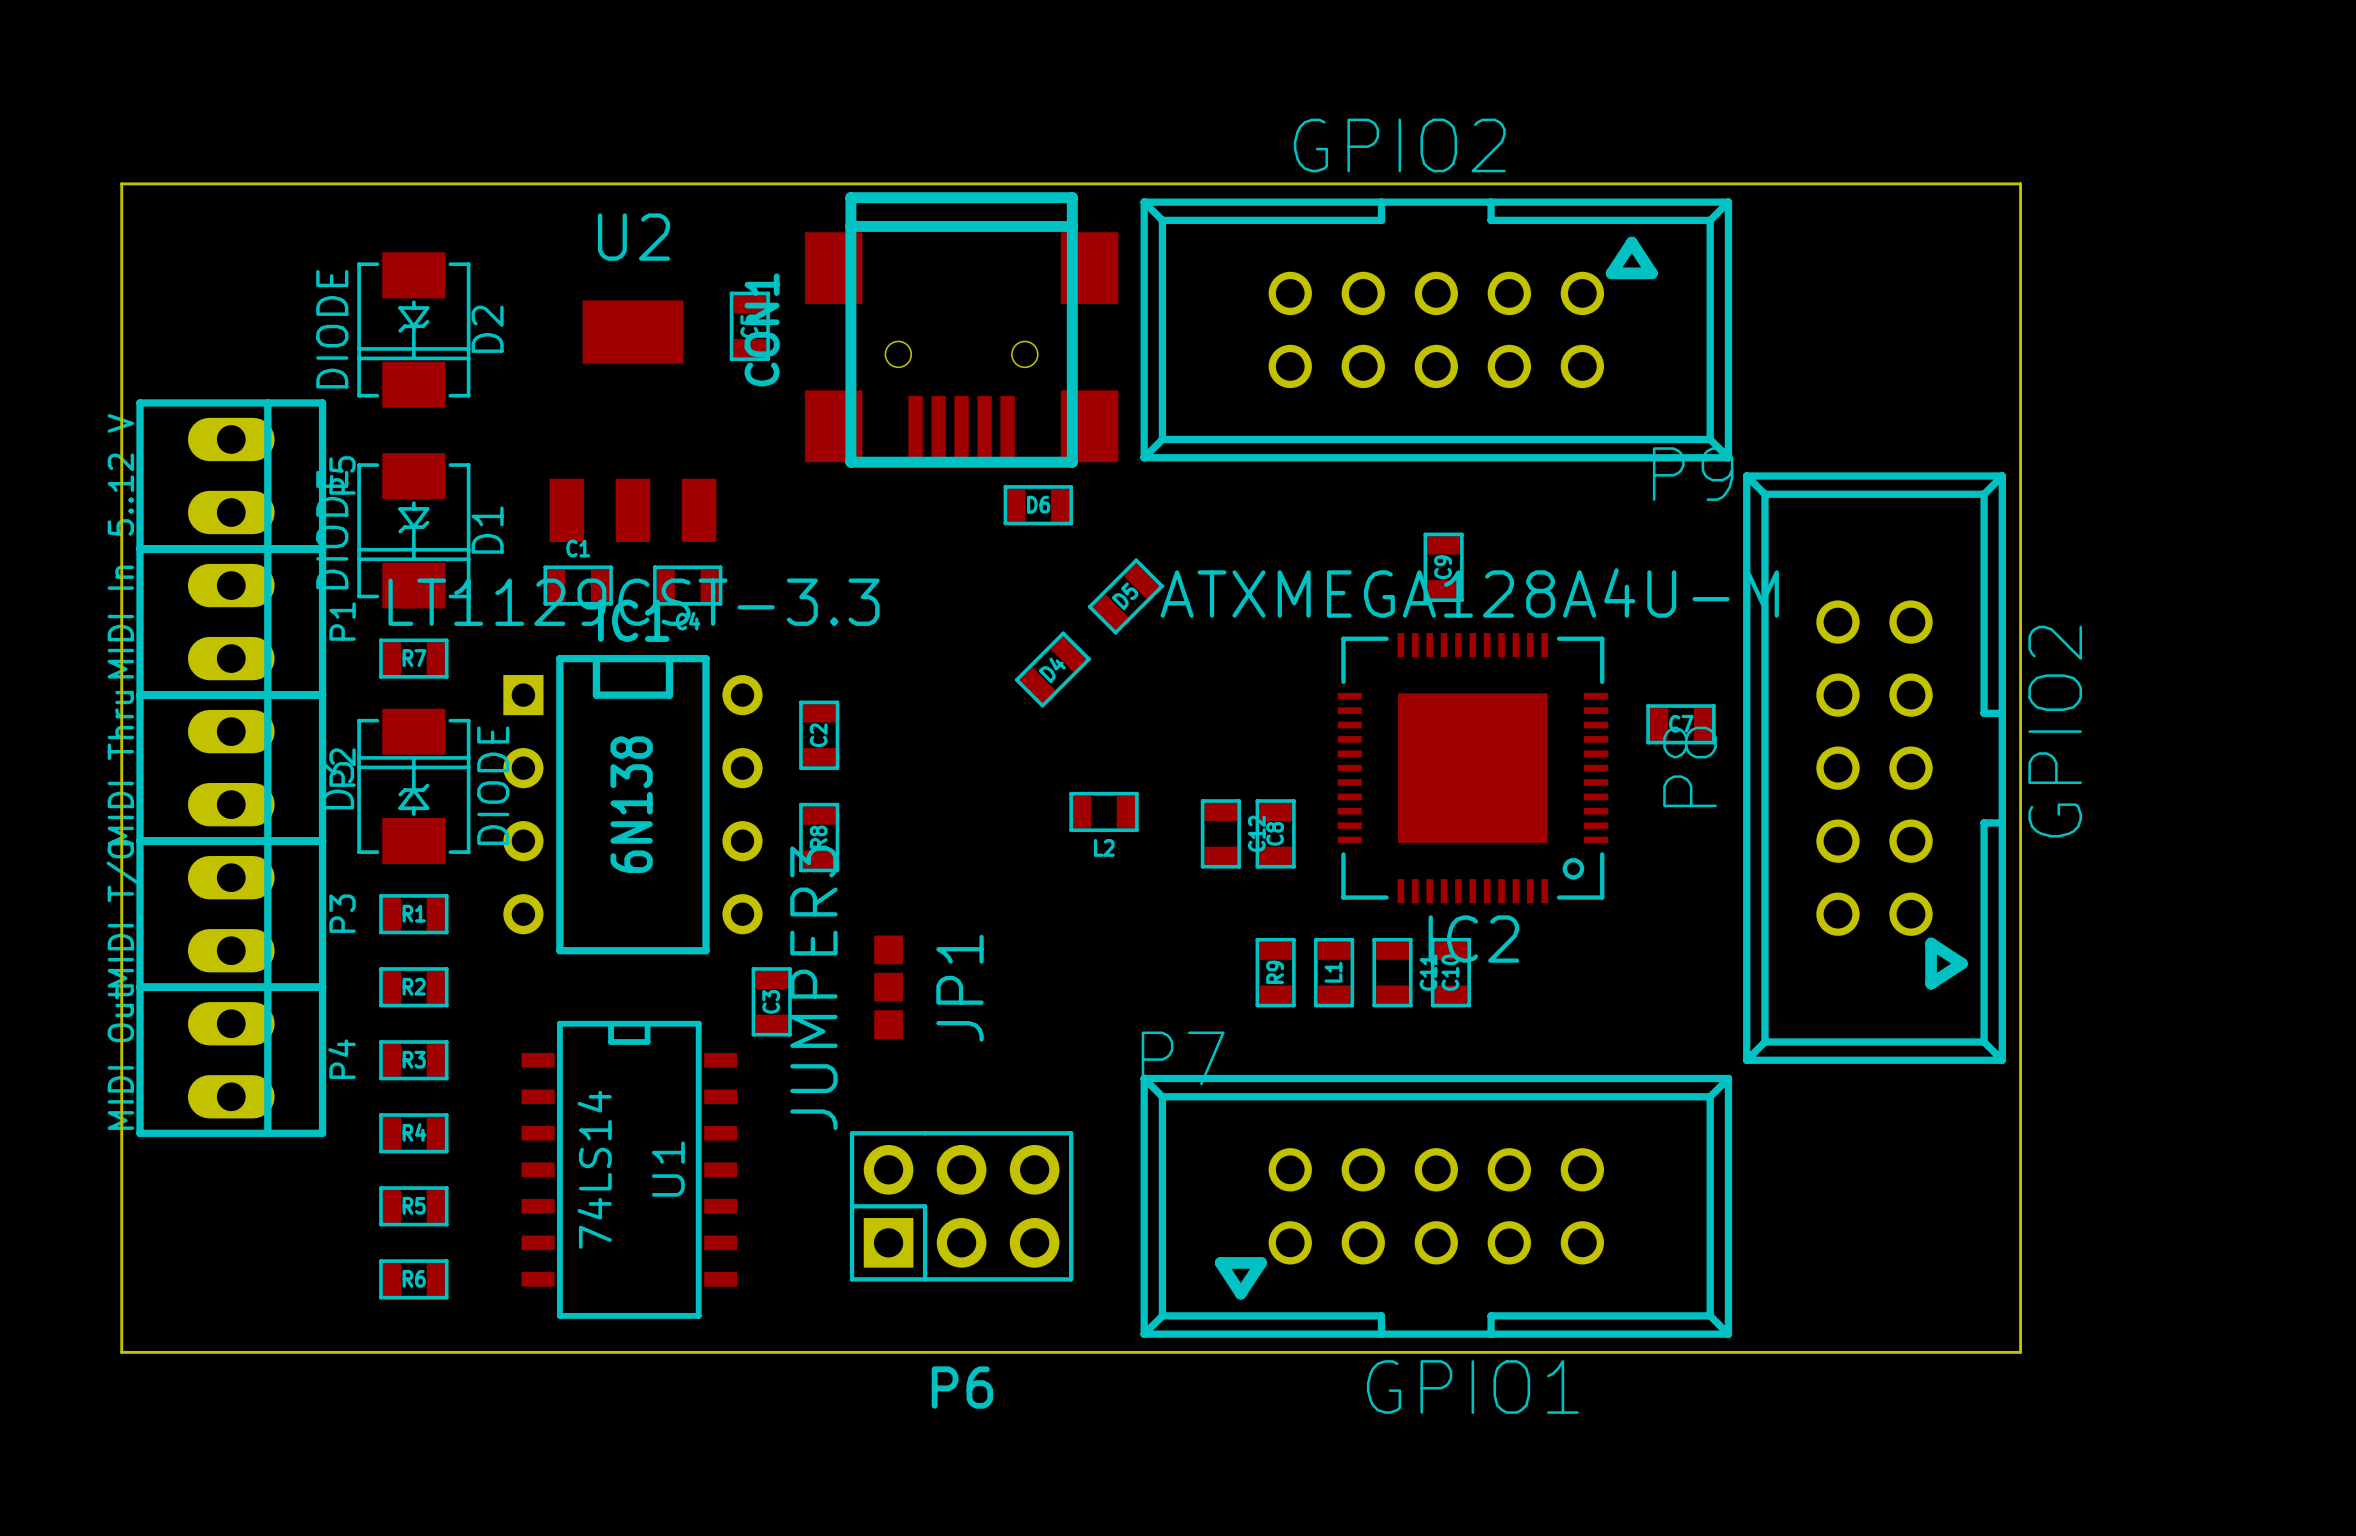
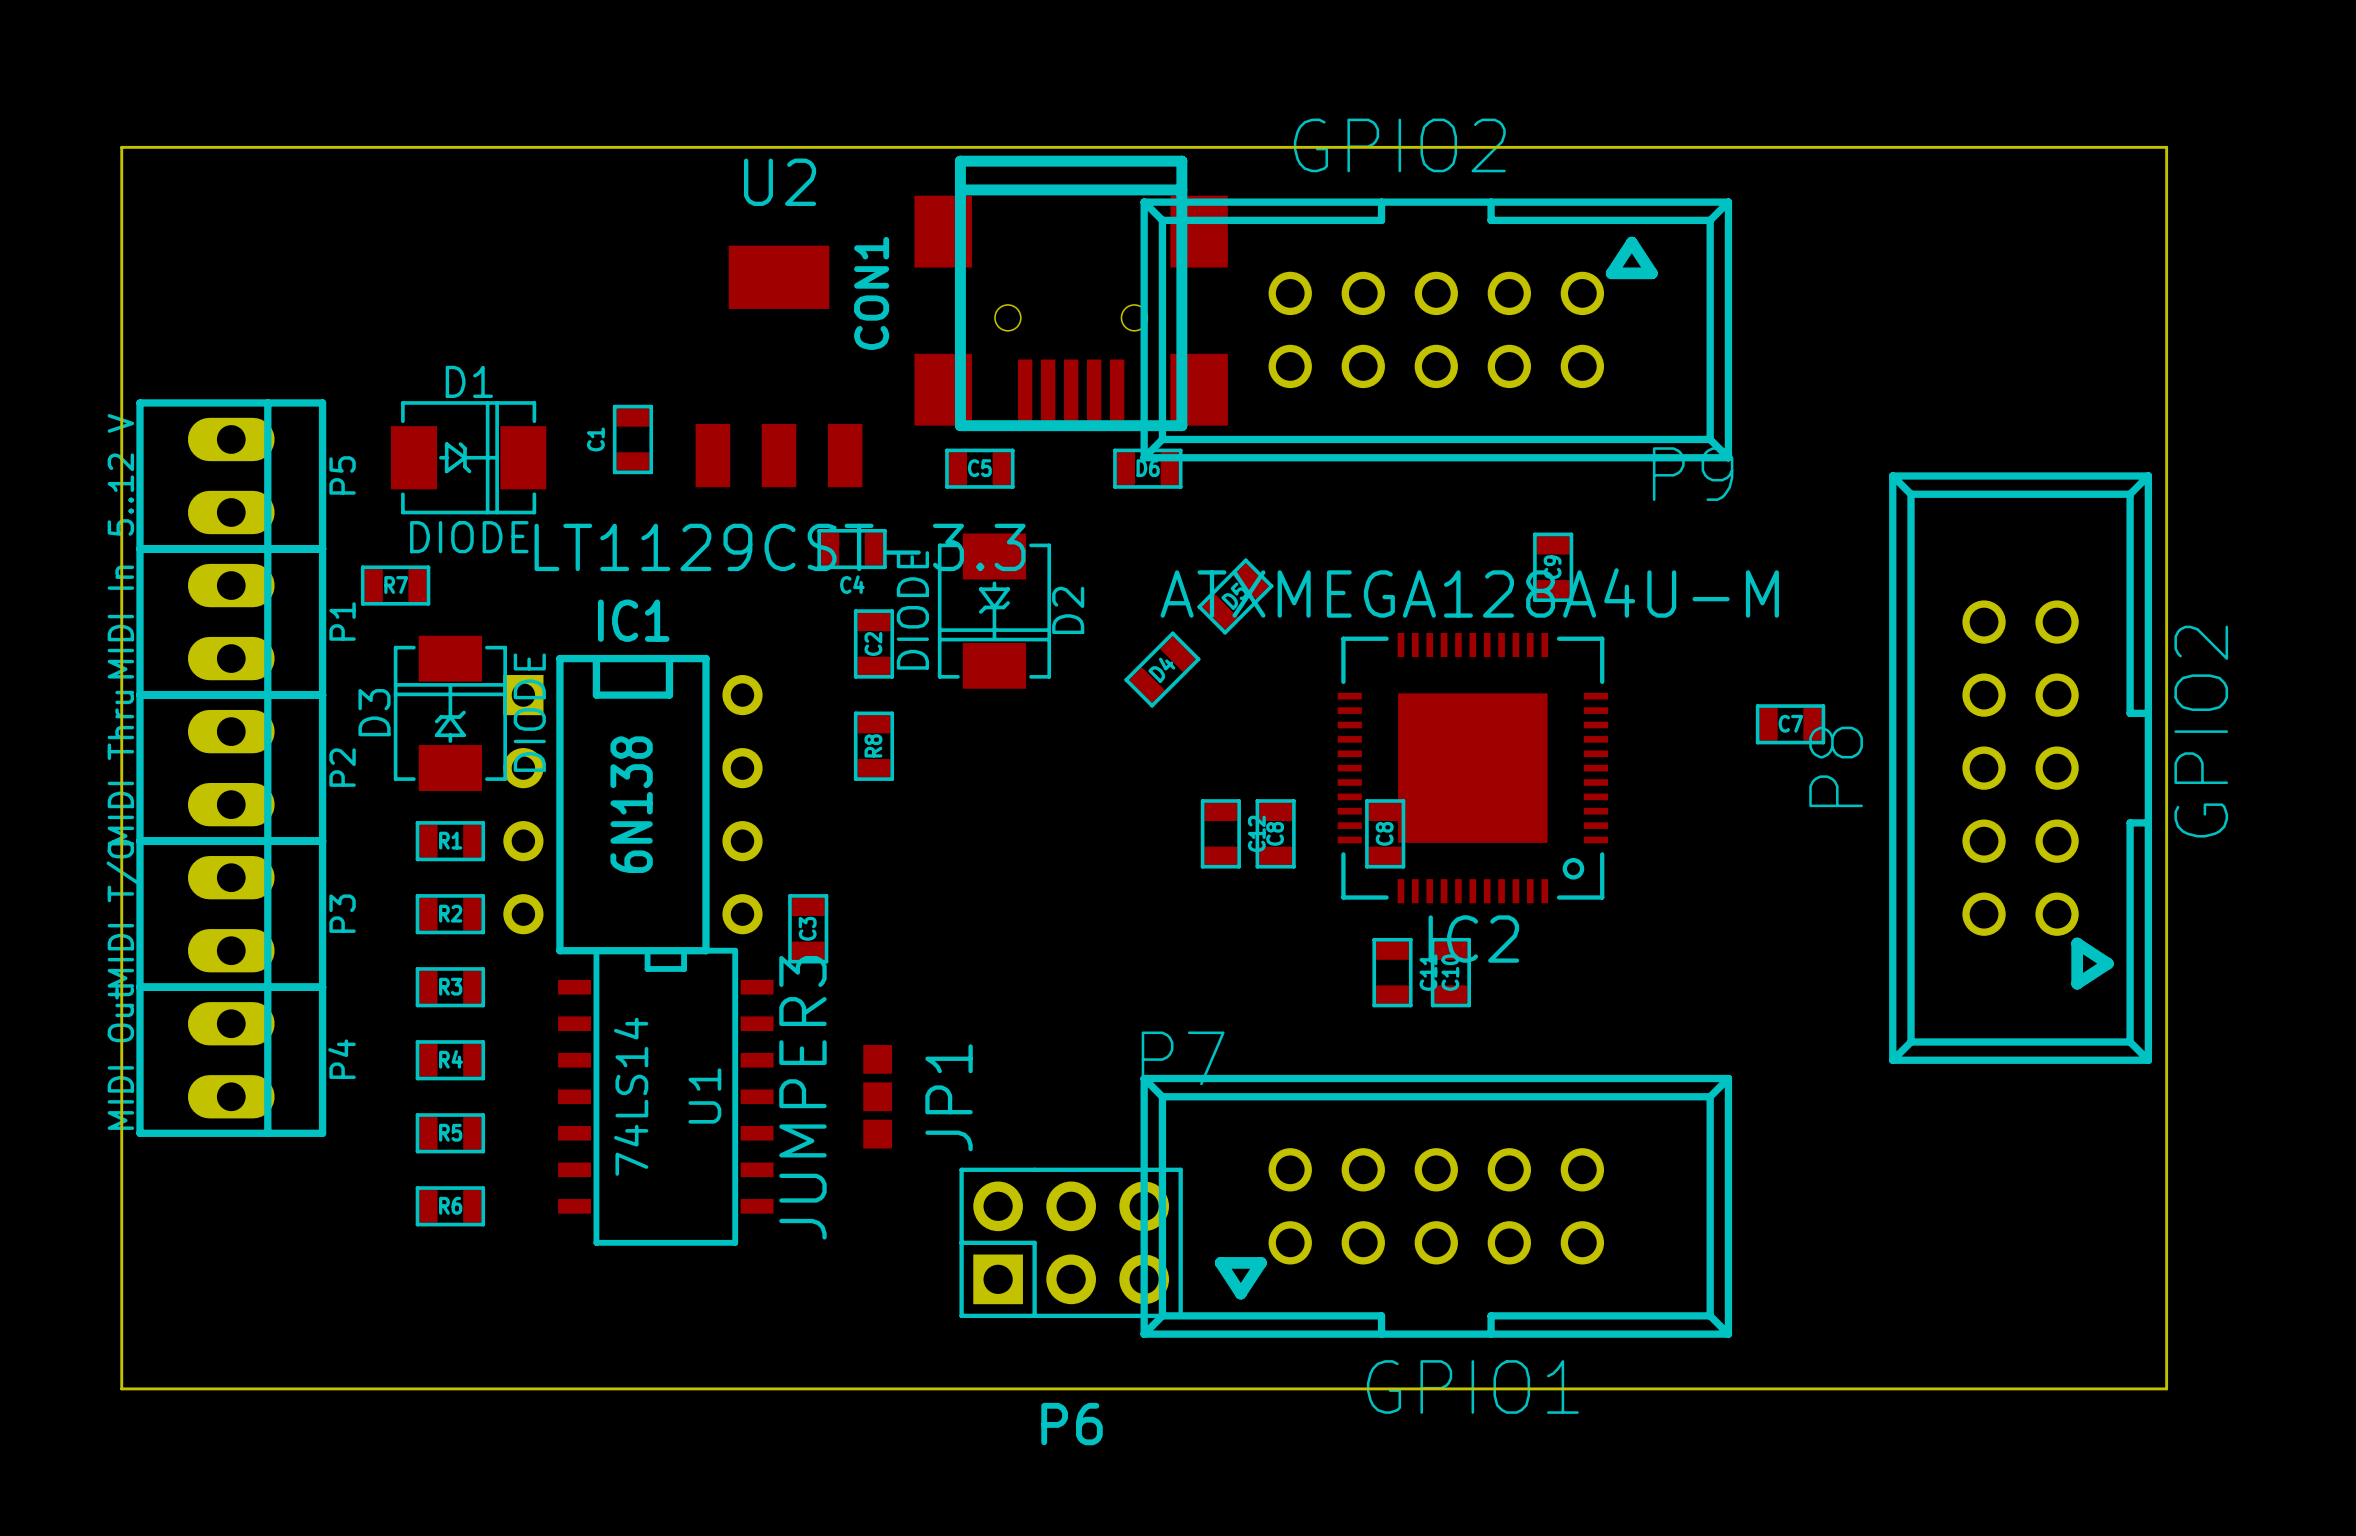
board edge: (121, 183) (2020, 183) (2020, 1352) (121, 1352) -> (121, 183) (121, 147) (2166, 147) (2166, 1388) (121, 1388) (121, 1352)
C5 rotation: 0° (749, 326) -> 90° clockwise (979, 468)
C5 position: (749, 326) -> (979, 468)
D2 position: (413, 329) -> (994, 611)
CON1 position: (961, 329) -> (1071, 293)
U2 position: (632, 421) -> (779, 366)
D6 position: (1038, 505) -> (1147, 468)
D1 rotation: 0° (413, 530) -> 90° counterclockwise (468, 457)
C9 position: (1443, 567) -> (1553, 567)
C1 rotation: 0° (578, 585) -> 90° clockwise (632, 439)
C1 position: (578, 585) -> (632, 439)
C4 position: (687, 585) -> (852, 549)
D5 position: (1125, 596) -> (1235, 596)
R7 position: (413, 658) -> (395, 585)
D4 position: (1052, 669) -> (1162, 669)
C7 position: (1680, 724) -> (1790, 724)
C2 position: (819, 735) -> (873, 643)
P8 position: (1874, 768) -> (2020, 768)
D3 position: (413, 786) -> (450, 713)
L2: (1104, 811) -> none
C8: none -> (1385, 833)
R8 position: (819, 837) -> (873, 746)
R1 position: (413, 914) -> (450, 841)
R9: (1275, 972) -> none
L1: (1334, 972) -> none
R2 position: (413, 987) -> (450, 914)
JP1 position: (888, 987) -> (877, 1096)
C3 position: (771, 1001) -> (808, 928)
R3 position: (413, 1060) -> (450, 987)
R4 position: (413, 1133) -> (450, 1060)
U1 position: (629, 1169) -> (665, 1096)
R5 position: (413, 1206) -> (450, 1133)
P6 position: (961, 1206) -> (1071, 1242)
R6 position: (413, 1279) -> (450, 1206)

